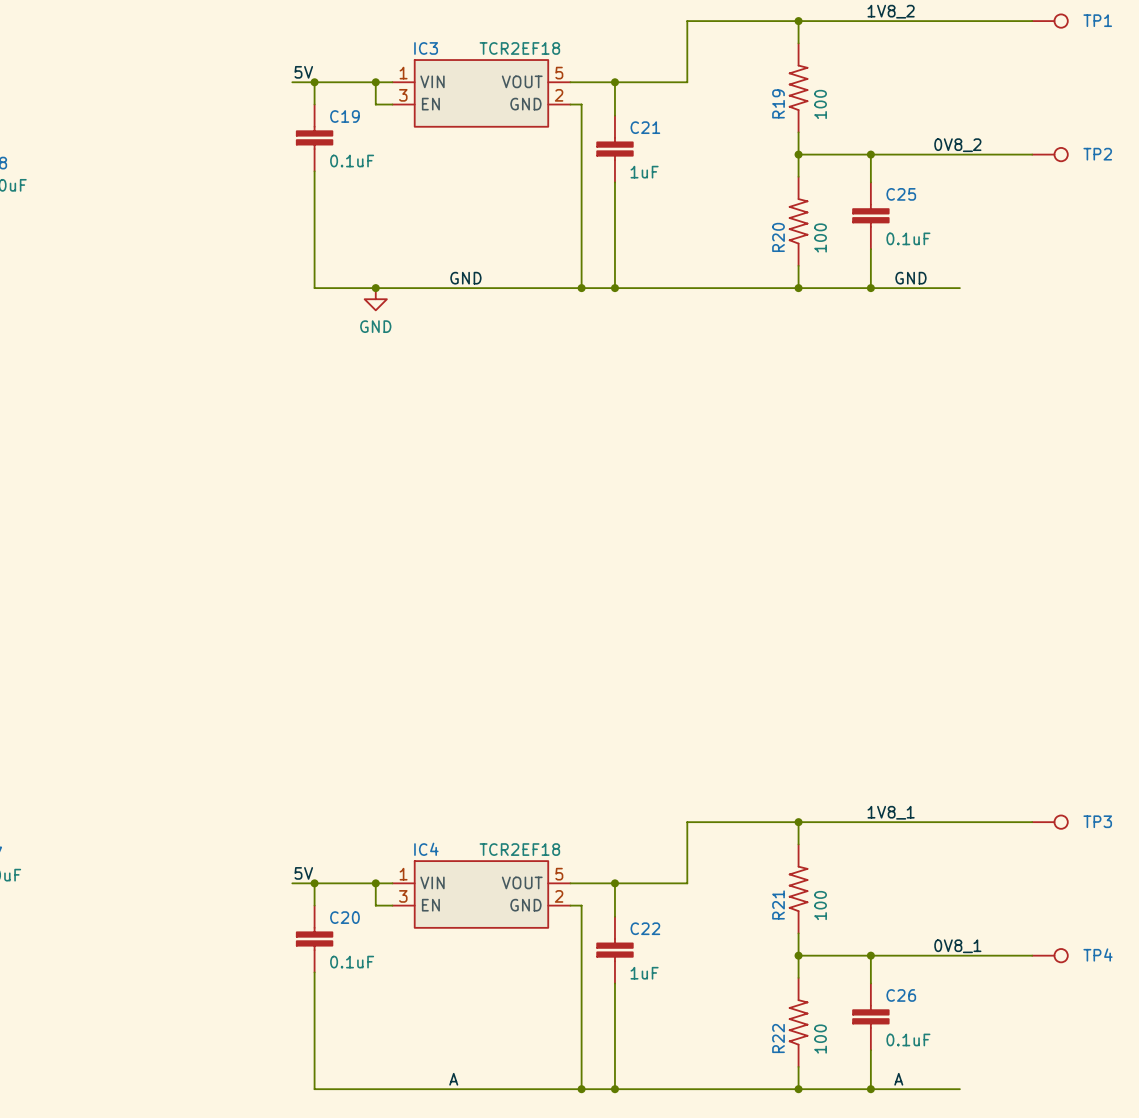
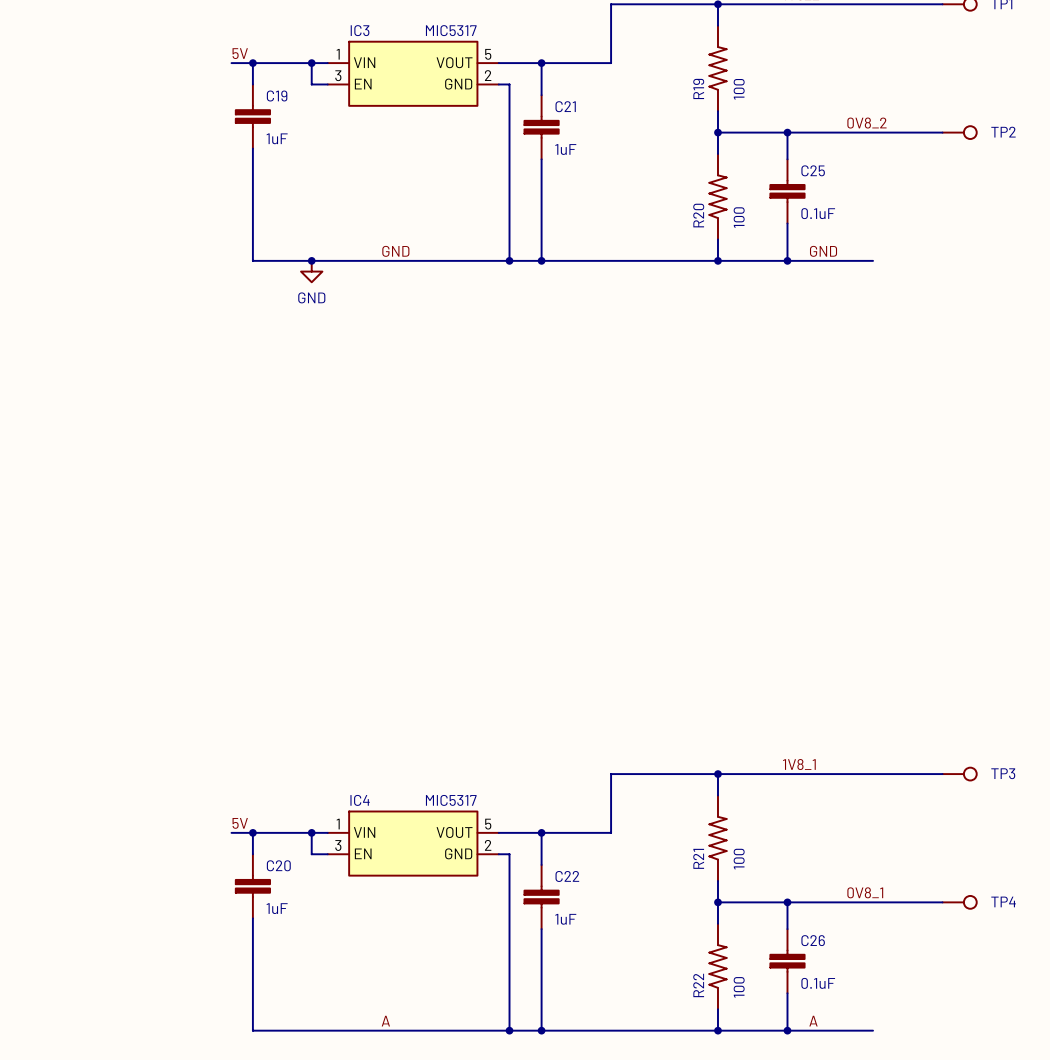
IC3 value: TCR2EF18 (519, 48) -> MIC5317 (451, 30)
C19 value: 0.1uF (352, 161) -> 1uF (277, 138)
IC4 value: TCR2EF18 (519, 849) -> MIC5317 (451, 800)
C20 value: 0.1uF (352, 962) -> 1uF (277, 908)

